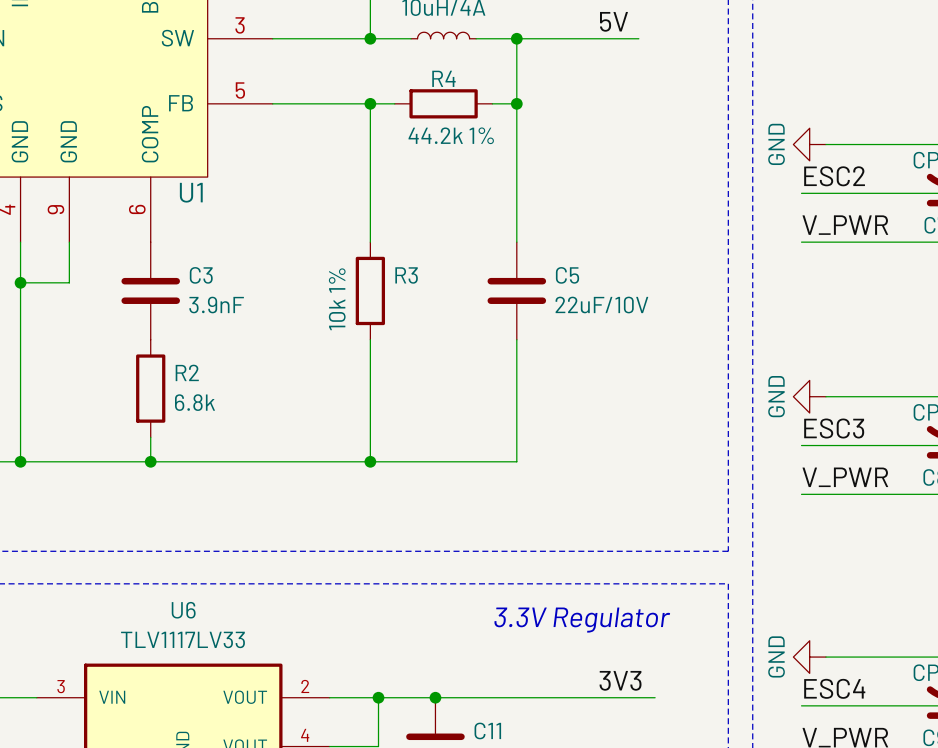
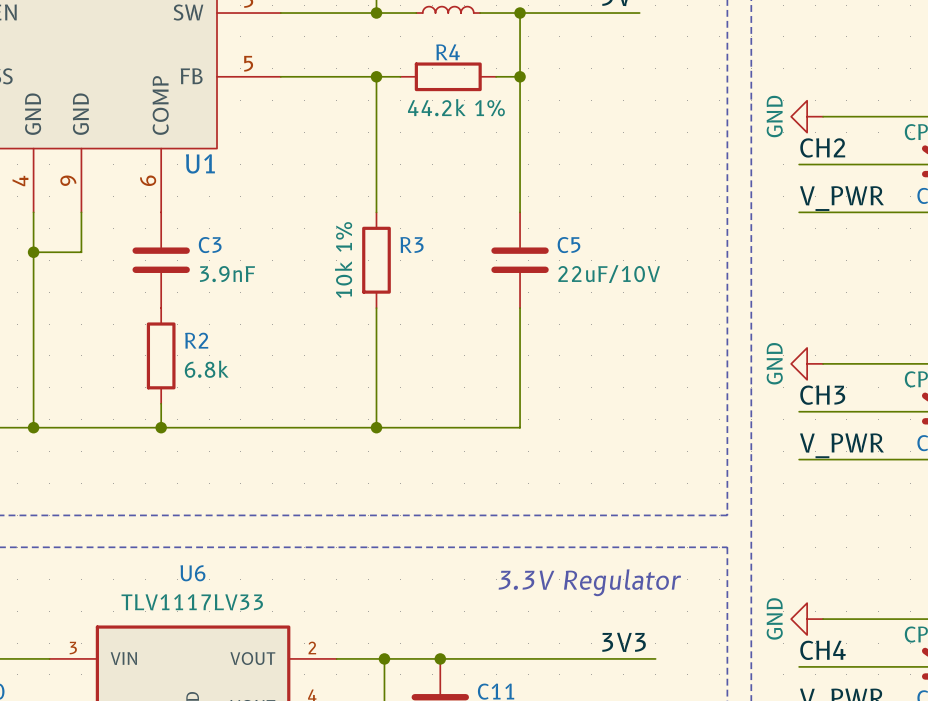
label: ESC2 (834, 176) -> CH2 (822, 147)
label: ESC3 (834, 428) -> CH3 (822, 395)
label: ESC4 (834, 688) -> CH4 (823, 650)

